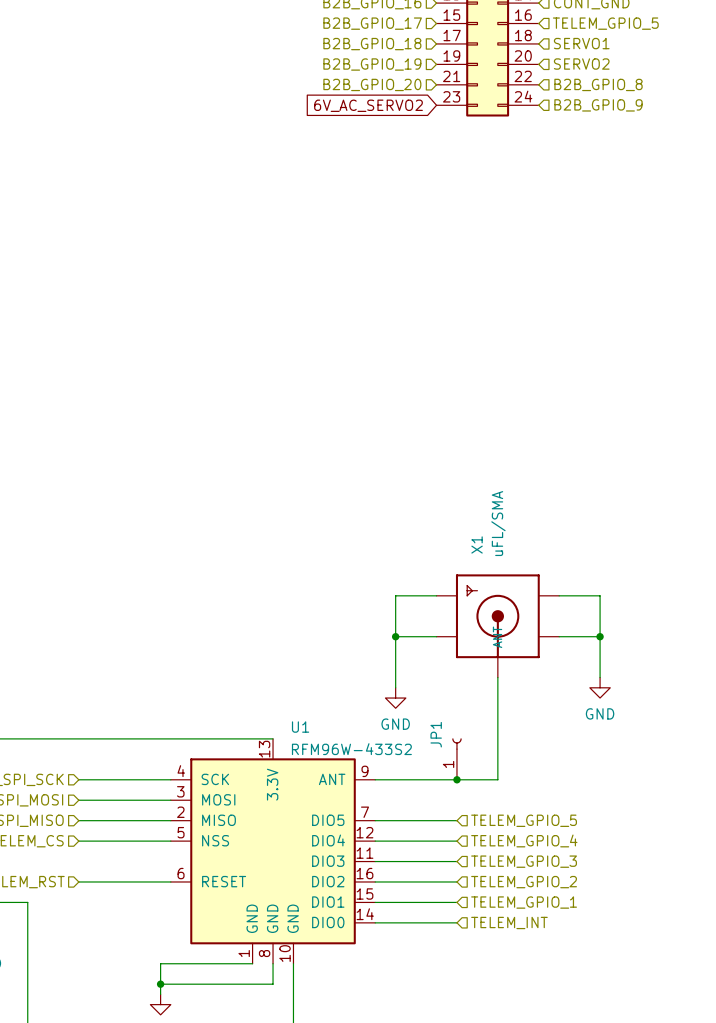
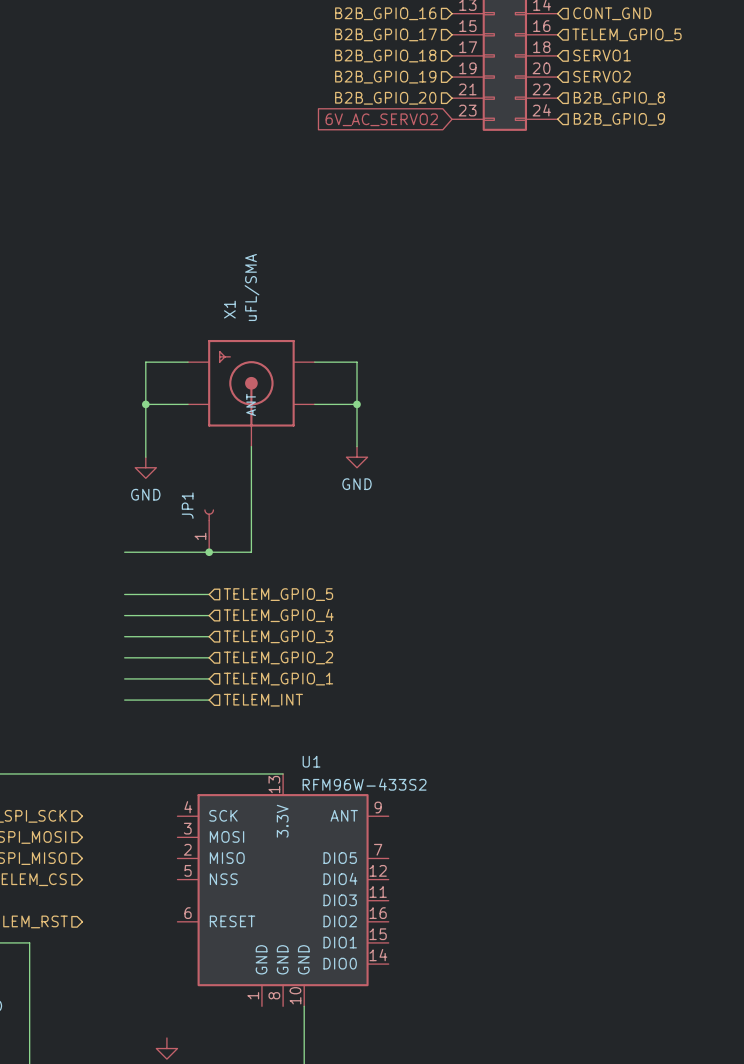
wire: none -> (188, 362) (145, 362) (145, 457)
wire: none -> (314, 362) (357, 362) (357, 446)
wire: none -> (145, 404) (188, 404)
junction: none -> (145, 404)
wire: none -> (314, 404) (357, 404)
junction: none -> (357, 404)
wire: none -> (251, 446) (251, 552) (124, 552)
power symbol: none -> GND (357, 457)
power symbol: none -> GND (145, 467)
junction: none -> (209, 552)
wire: none -> (124, 594) (209, 594)
hierarchical label: none -> TELEM_GPIO_5 (278, 594)
wire: none -> (124, 615) (209, 615)
hierarchical label: none -> TELEM_GPIO_4 (278, 615)
wire: (436, 595) (395, 595) (395, 687) -> none
wire: (559, 595) (600, 595) (600, 677) -> none
wire: none -> (124, 636) (209, 636)
hierarchical label: none -> TELEM_GPIO_3 (278, 636)
X1 position: (497, 625) -> (251, 393)
wire: none -> (124, 657) (209, 657)
hierarchical label: none -> TELEM_GPIO_2 (278, 657)
wire: (395, 636) (436, 636) -> none
junction: (395, 636) -> none
wire: (559, 636) (600, 636) -> none
junction: (600, 636) -> none
wire: none -> (124, 678) (209, 678)
hierarchical label: none -> TELEM_GPIO_1 (278, 679)
wire: none -> (124, 700) (209, 700)
hierarchical label: none -> TELEM_INT (263, 700)
wire: (497, 677) (497, 779) (375, 779) -> none
power symbol: GND (600, 687) -> none
power symbol: GND (395, 698) -> none
JP1 position: (456, 759) -> (209, 530)
wire: (78, 779) (170, 779) -> none
junction: (456, 779) -> none
wire: (78, 800) (170, 800) -> none
wire: (78, 820) (170, 820) -> none
wire: (375, 820) (456, 820) -> none
hierarchical label: TELEM_GPIO_5 (524, 820) -> none
hierarchical label: TELEM_GPIO_4 (524, 840) -> none
wire: (78, 841) (170, 841) -> none
wire: (375, 841) (456, 841) -> none
wire: (375, 861) (456, 861) -> none
hierarchical label: TELEM_GPIO_3 (524, 861) -> none
wire: (78, 881) (170, 881) -> none
wire: (375, 881) (456, 881) -> none
hierarchical label: TELEM_GPIO_2 (524, 882) -> none
wire: (375, 902) (456, 902) -> none
hierarchical label: TELEM_GPIO_1 (524, 902) -> none
wire: (375, 922) (456, 922) -> none
hierarchical label: TELEM_INT (509, 922) -> none
wire: (252, 963) (160, 963) (160, 994) -> none
wire: (273, 963) (273, 984) (160, 984) -> none
junction: (160, 984) -> none

